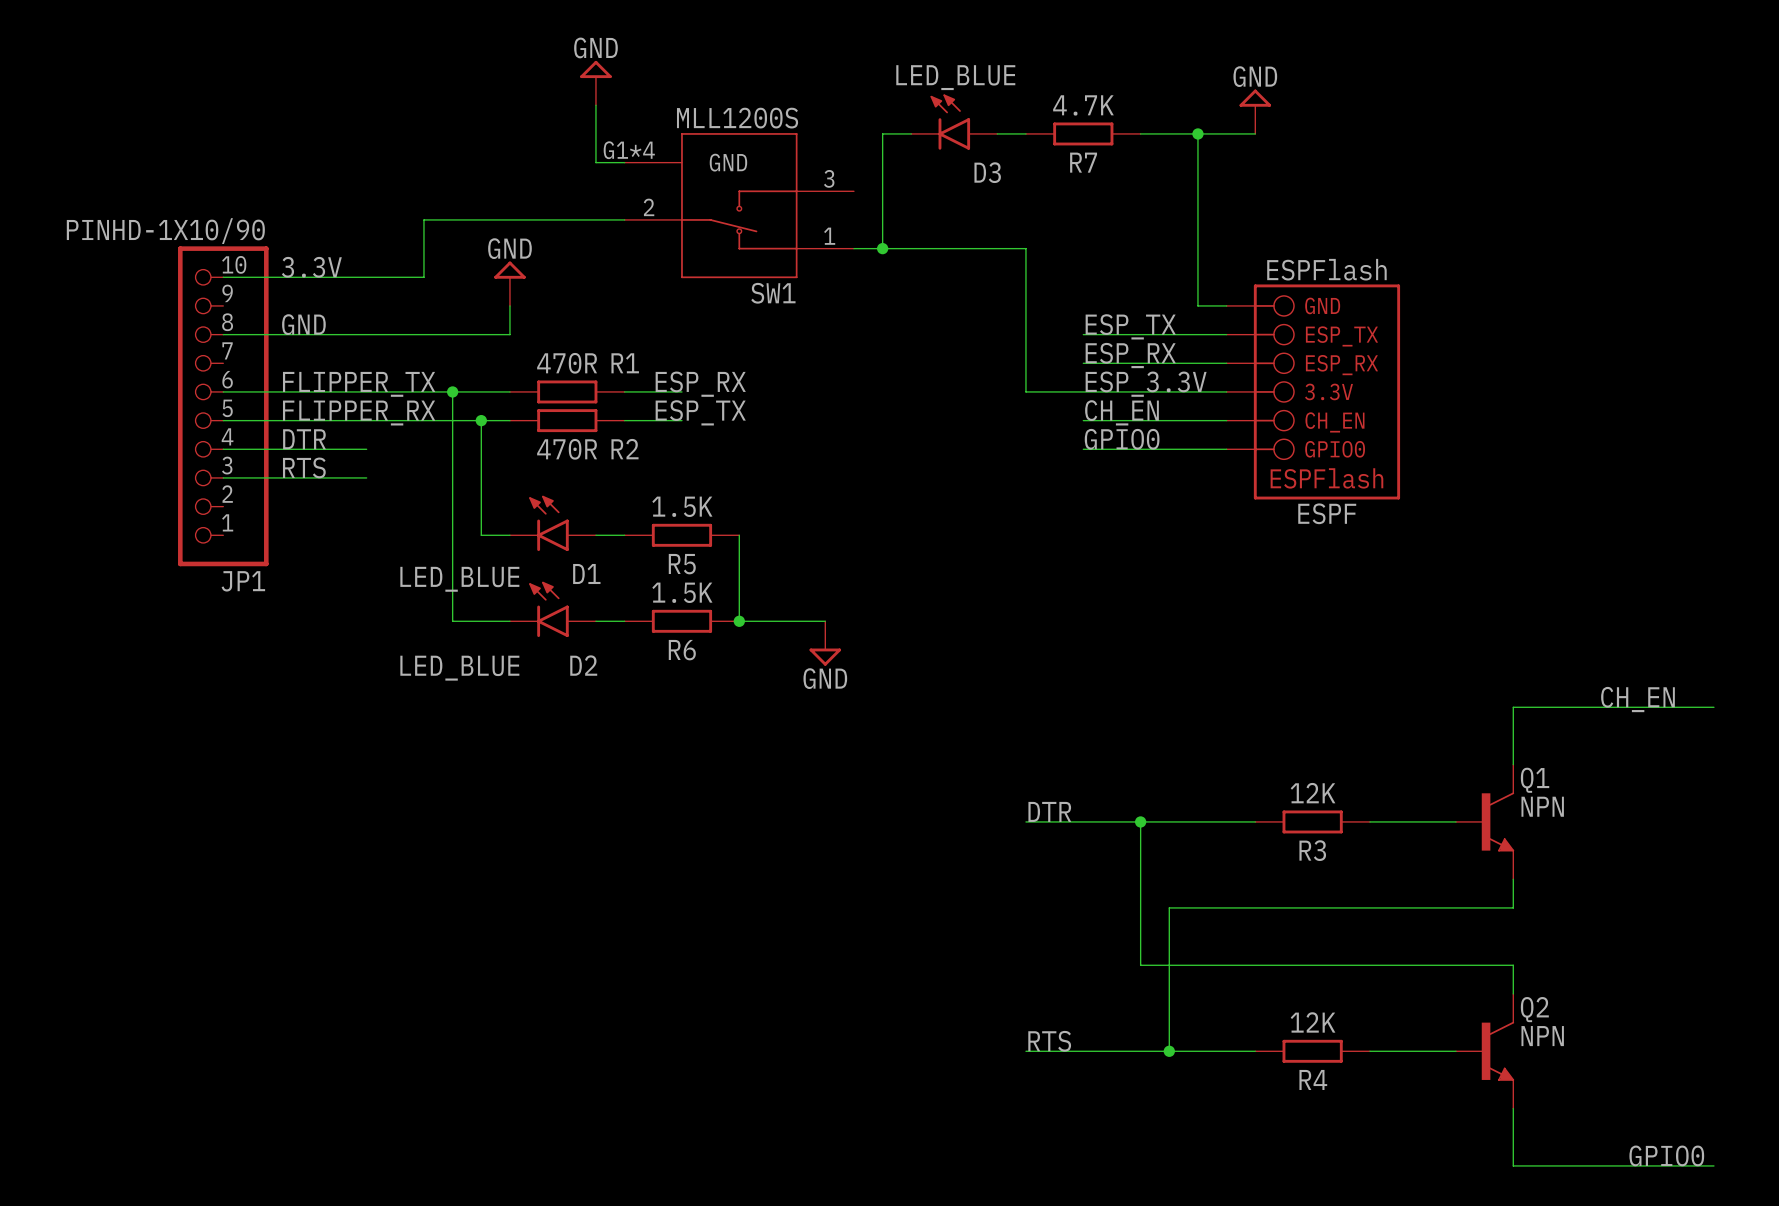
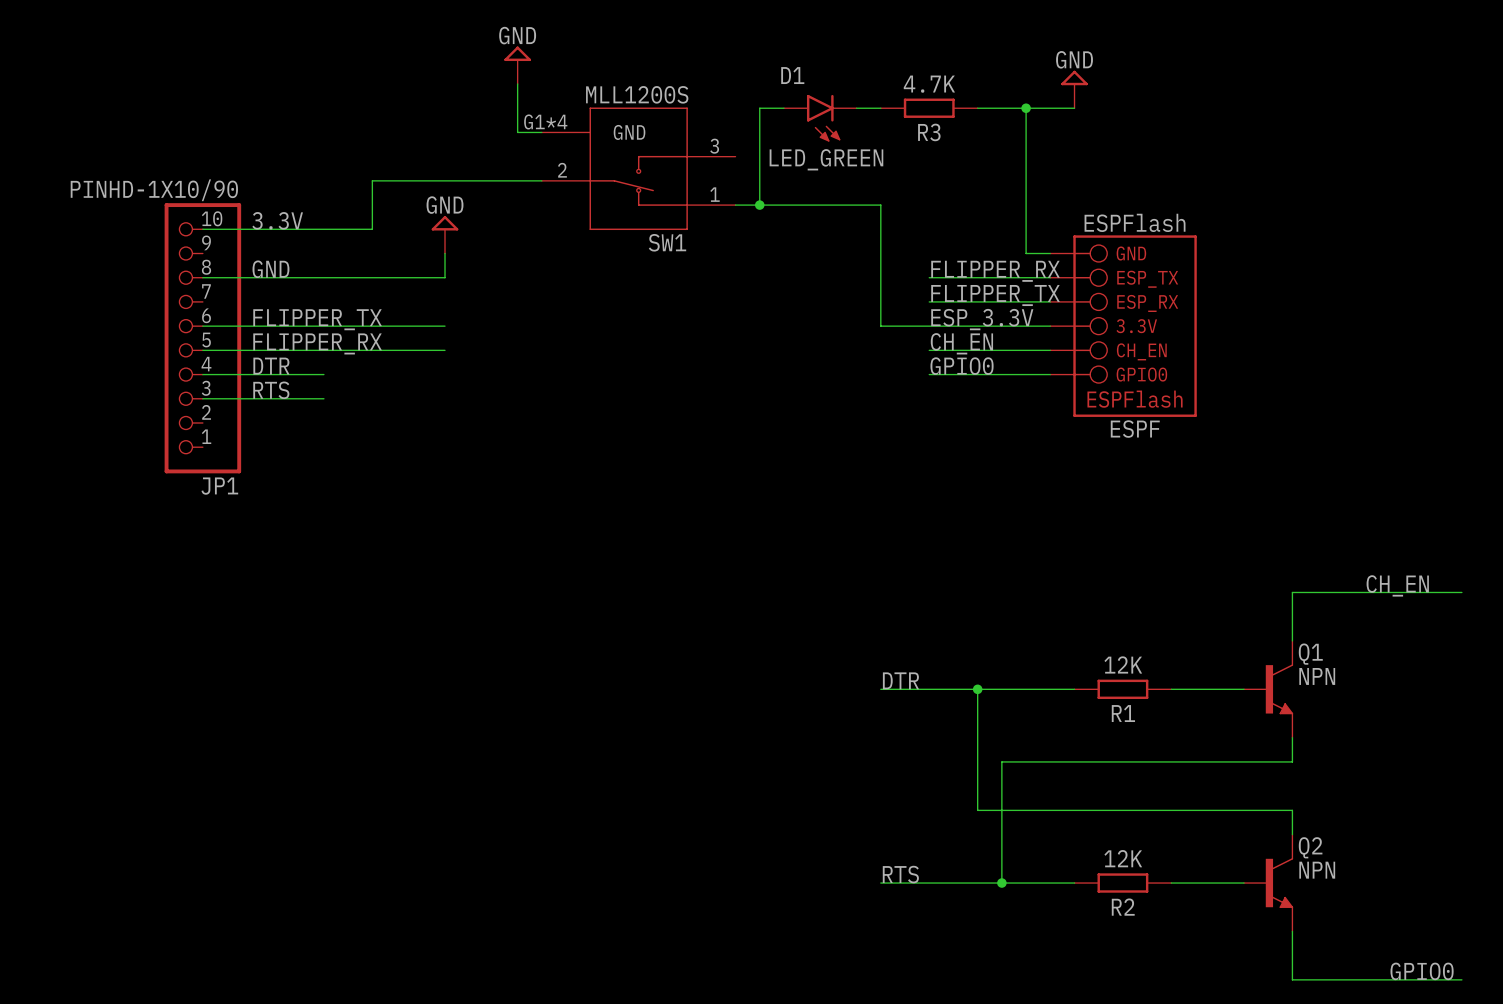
D3: LED_BLUE (954, 122) -> none
R7 name: R7 (1083, 162) -> R3 (929, 132)
label: ESP_TX (1130, 326) -> FLIPPER_RX (995, 271)
label: ESP_RX (1130, 355) -> FLIPPER_TX (995, 295)
label: ESP_RX (700, 384) -> none
wire: (452, 391) (452, 621) (509, 621) -> none
junction: (452, 391) -> none
R1: 470R (567, 391) -> none
wire: (624, 391) (681, 391) -> none
label: ESP_TX (700, 412) -> none
wire: (481, 420) (481, 535) (509, 535) -> none
junction: (481, 420) -> none
R2: 470R (567, 420) -> none
wire: (624, 420) (681, 420) -> none
D1 rotation: 0° (548, 523) -> 180° (823, 118)
D1 position: (552, 523) -> (820, 118)
wire: (595, 535) (624, 535) -> none
R5: 1.5K (681, 535) -> none
wire: (739, 535) (739, 621) (825, 621) -> none
D1 value: LED_BLUE (459, 579) -> LED_GREEN (826, 159)
D2: LED_BLUE (552, 609) -> none
wire: (595, 621) (624, 621) -> none
R6: 1.5K (681, 621) -> none
junction: (739, 621) -> none
power symbol: GND (825, 643) -> none
R3 name: R3 (1312, 850) -> R1 (1123, 713)
R4 name: R4 (1313, 1079) -> R2 (1123, 907)

